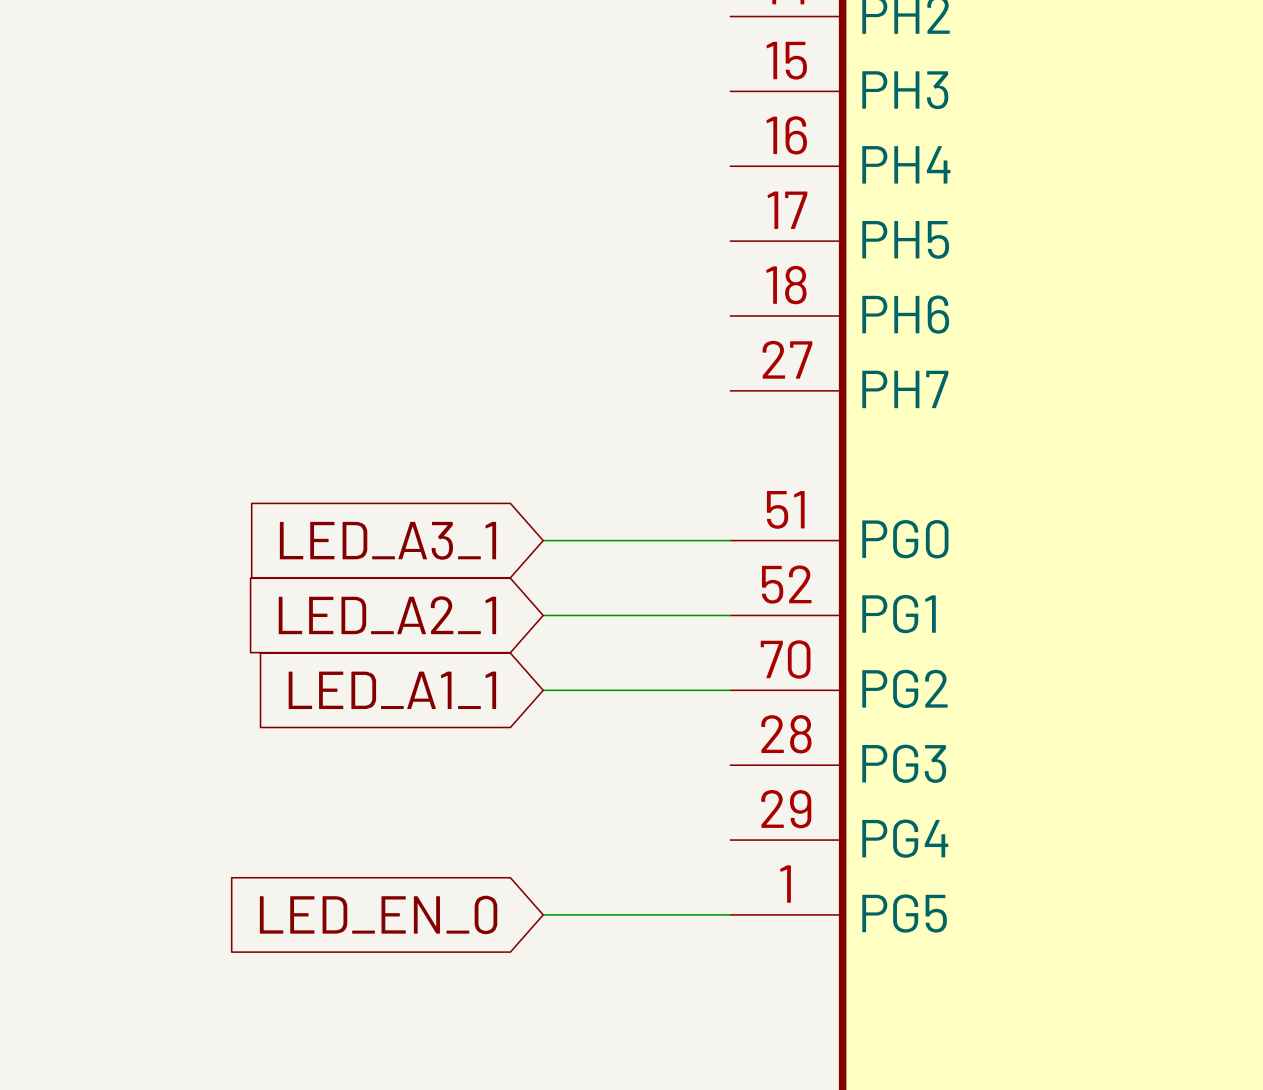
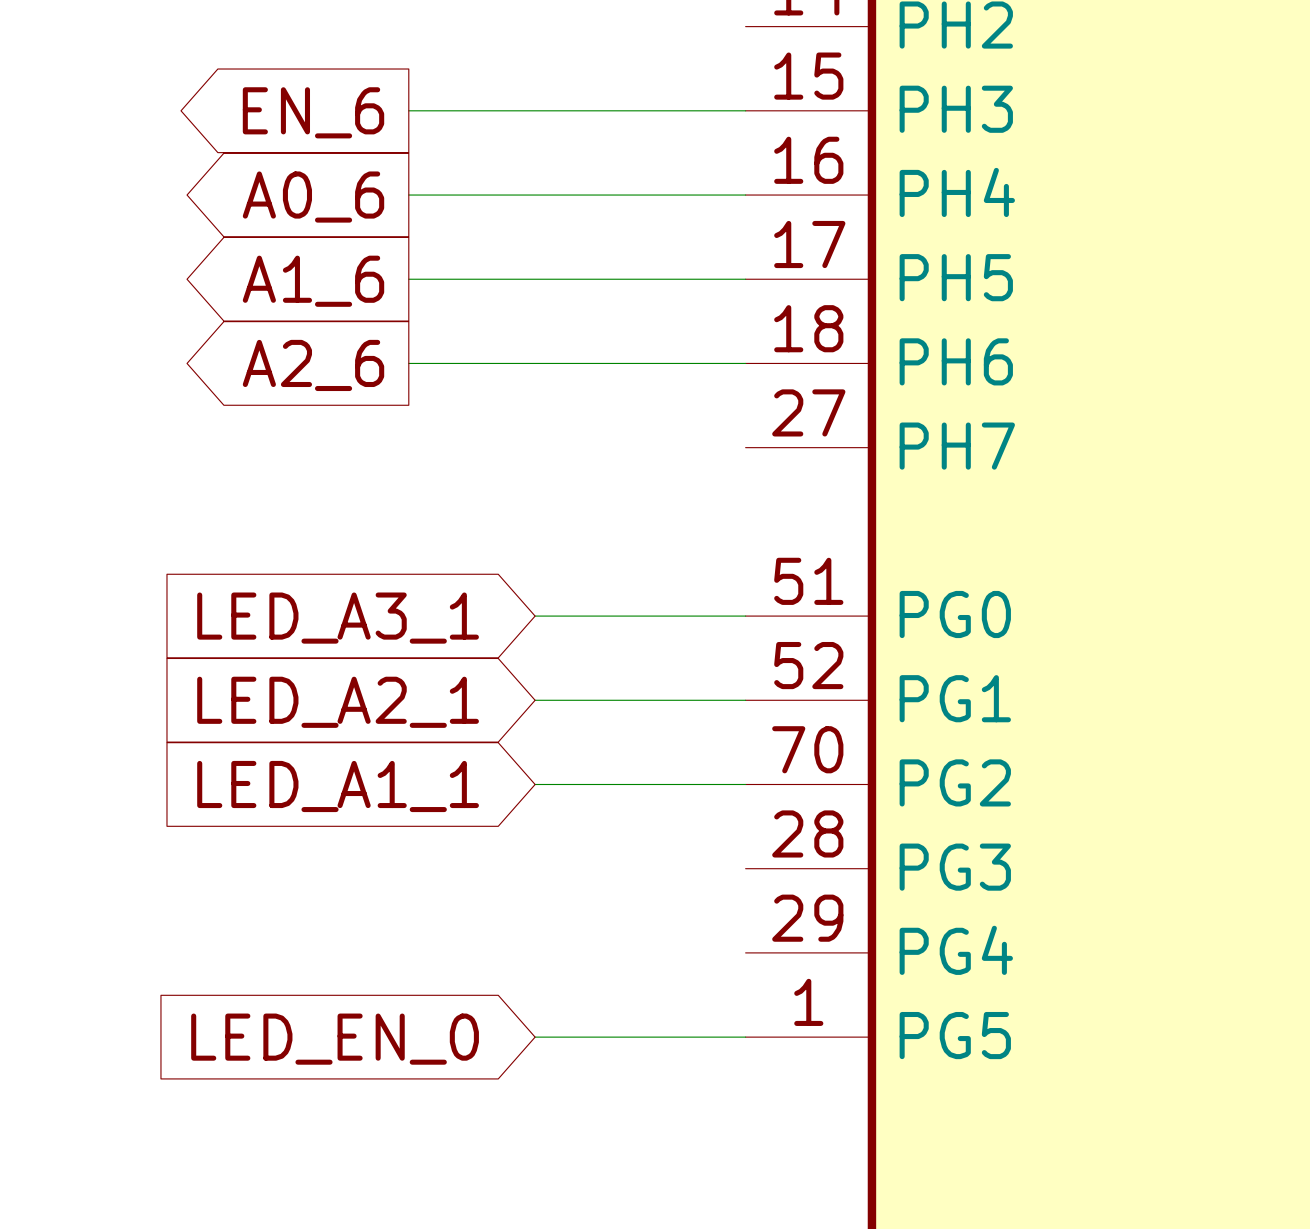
global label: none -> EN_6 (313, 112)
wire: none -> (408, 110) (745, 110)
global label: none -> A0_6 (313, 197)
wire: none -> (408, 195) (745, 195)
global label: none -> A1_6 (313, 281)
wire: none -> (408, 279) (745, 279)
global label: none -> A2_6 (313, 365)
wire: none -> (408, 363) (745, 363)

